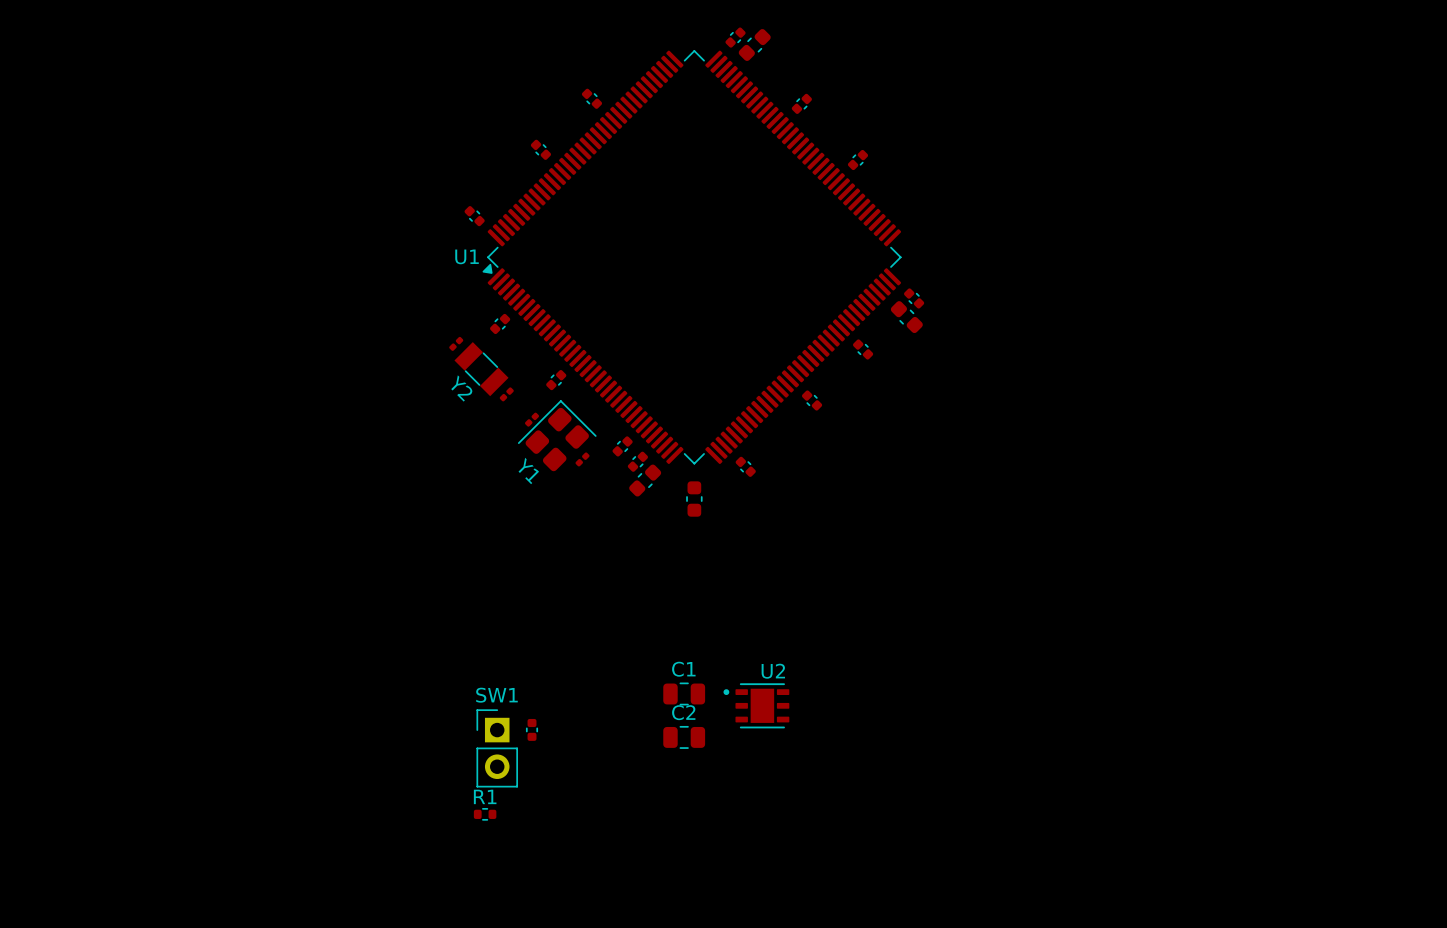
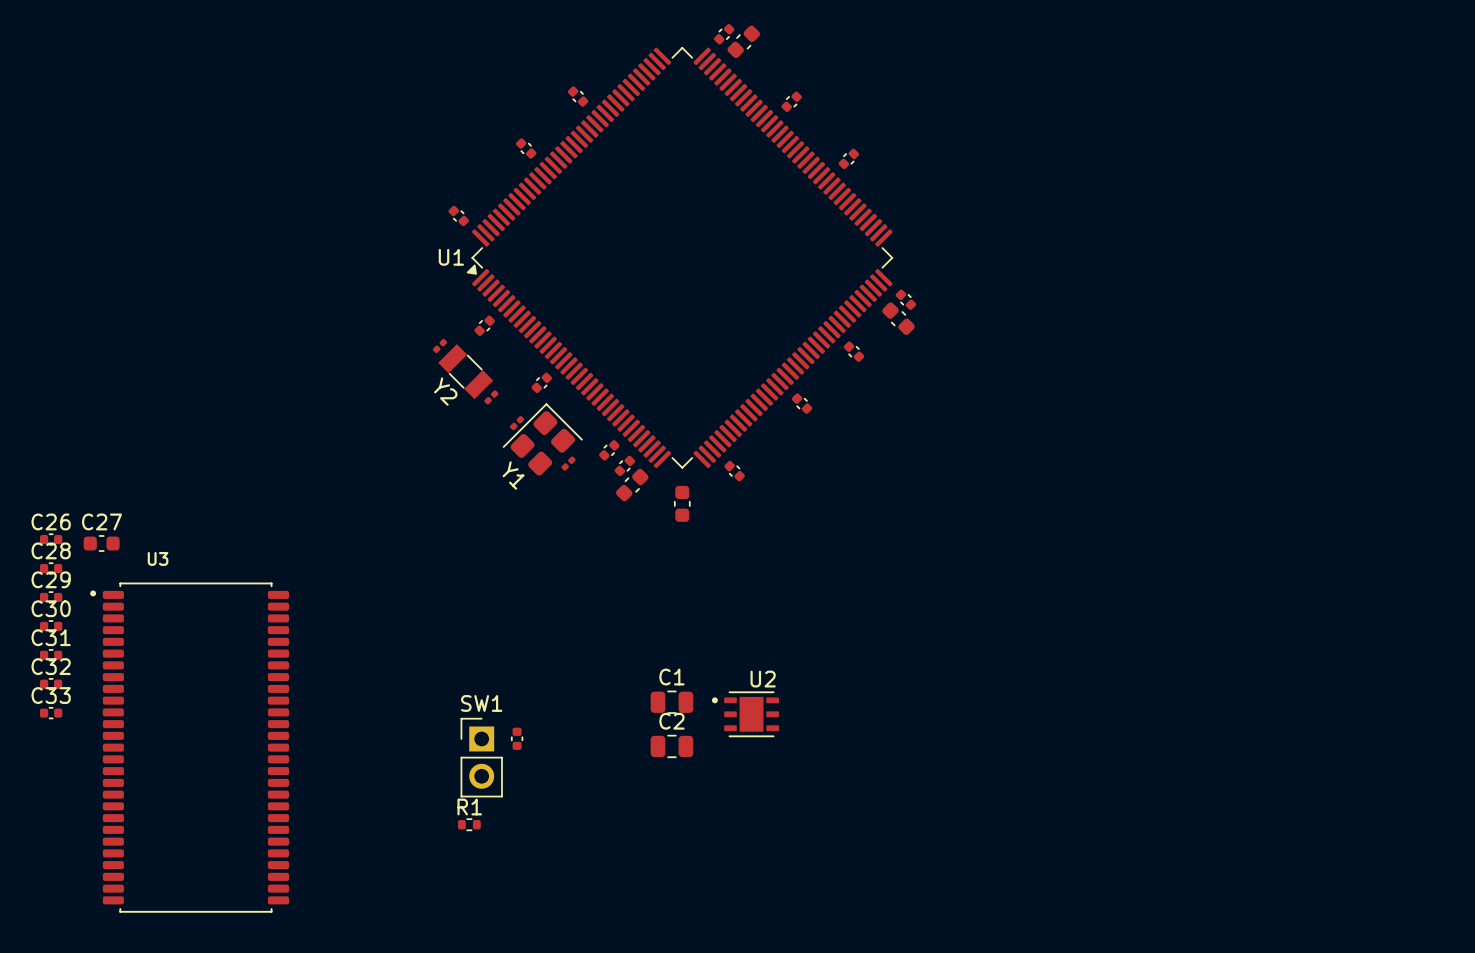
C26: none -> (51, 539)
C27: none -> (101, 543)
C28: none -> (51, 568)
C29: none -> (51, 597)
C30: none -> (51, 626)
C31: none -> (51, 655)
C32: none -> (51, 684)
C33: none -> (51, 713)
U3: none -> (189, 747)

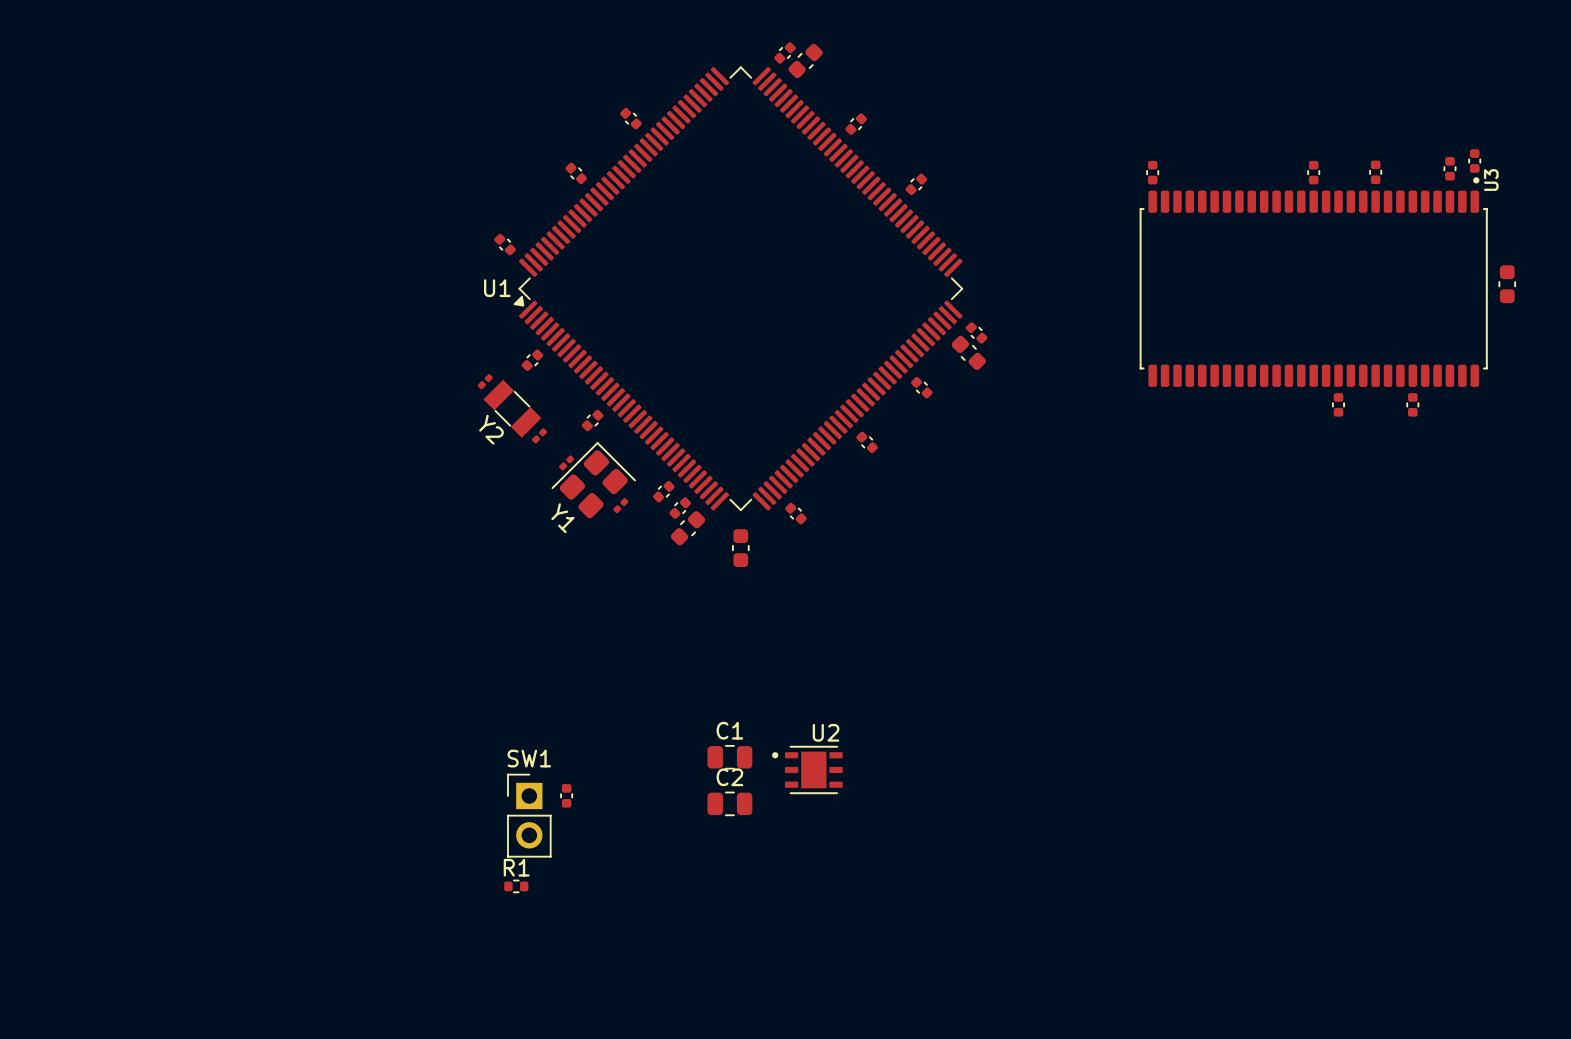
part: none -> (1474, 161)
part: none -> (1449, 168)
part: none -> (1152, 172)
part: none -> (1313, 172)
part: none -> (1375, 172)
part: none -> (1507, 284)
part: none -> (1338, 404)
part: none -> (1412, 404)
C26: (51, 539) -> none
C27: (101, 543) -> none
U3 name position: U3 (158, 558) -> U3 (1491, 180)
C28: (51, 568) -> none
C29: (51, 597) -> none
C30: (51, 626) -> none
C31: (51, 655) -> none
C32: (51, 684) -> none
C33: (51, 713) -> none
U3 rotation: 0° (189, 747) -> 90° clockwise (1313, 282)
U3 position: (189, 747) -> (1313, 282)

